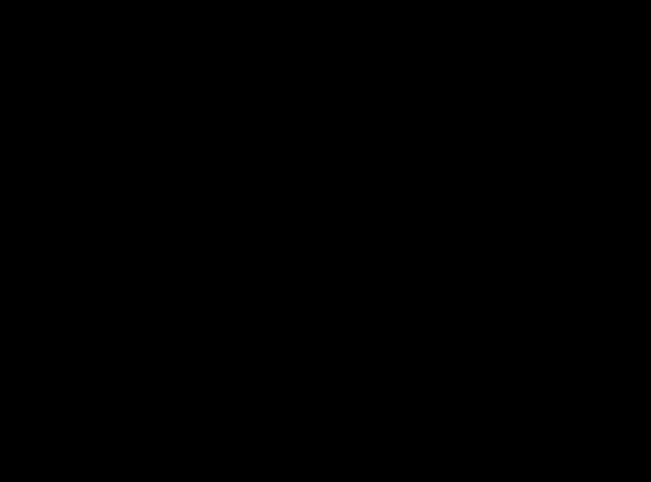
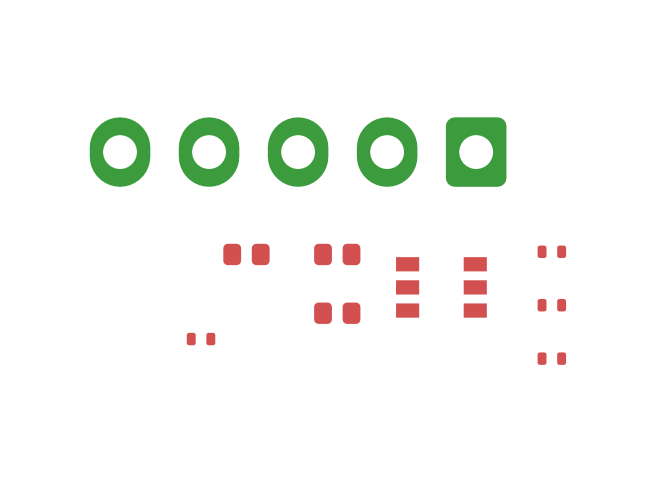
part: none -> (298, 152)
part: none -> (551, 251)
part: none -> (246, 254)
part: none -> (337, 254)
part: none -> (441, 287)
part: none -> (551, 305)
part: none -> (337, 313)
part: none -> (201, 339)
part: none -> (551, 358)

